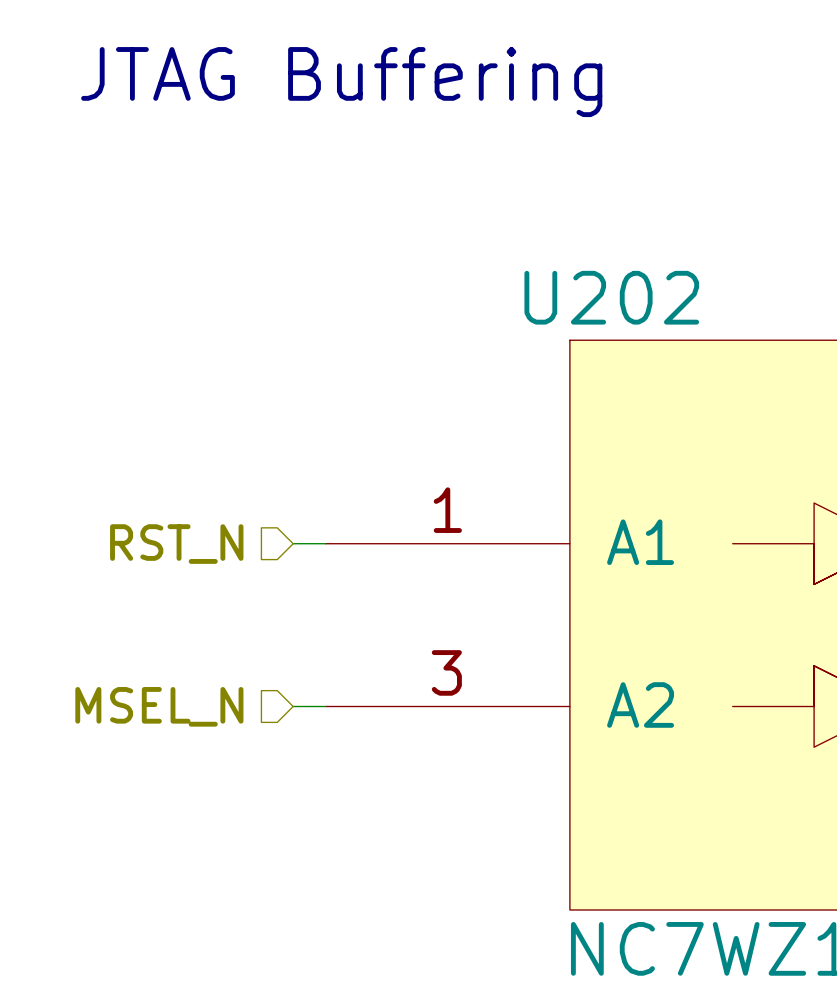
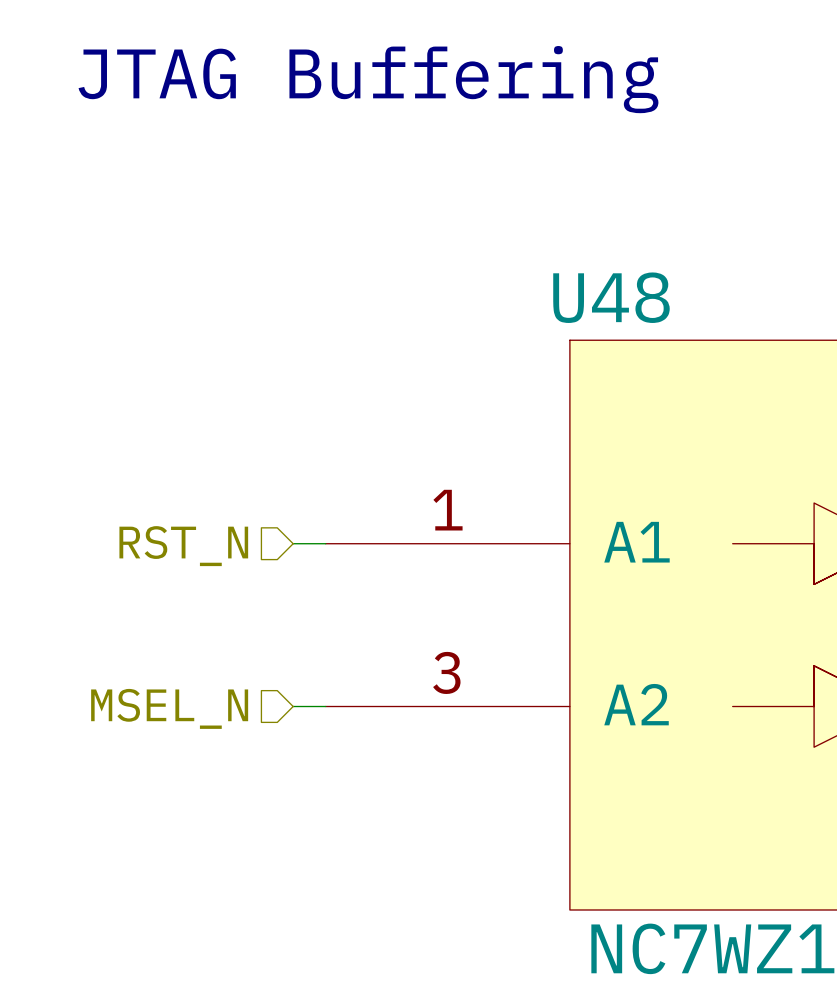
U202 name: U202 (611, 297) -> U48 (611, 297)

